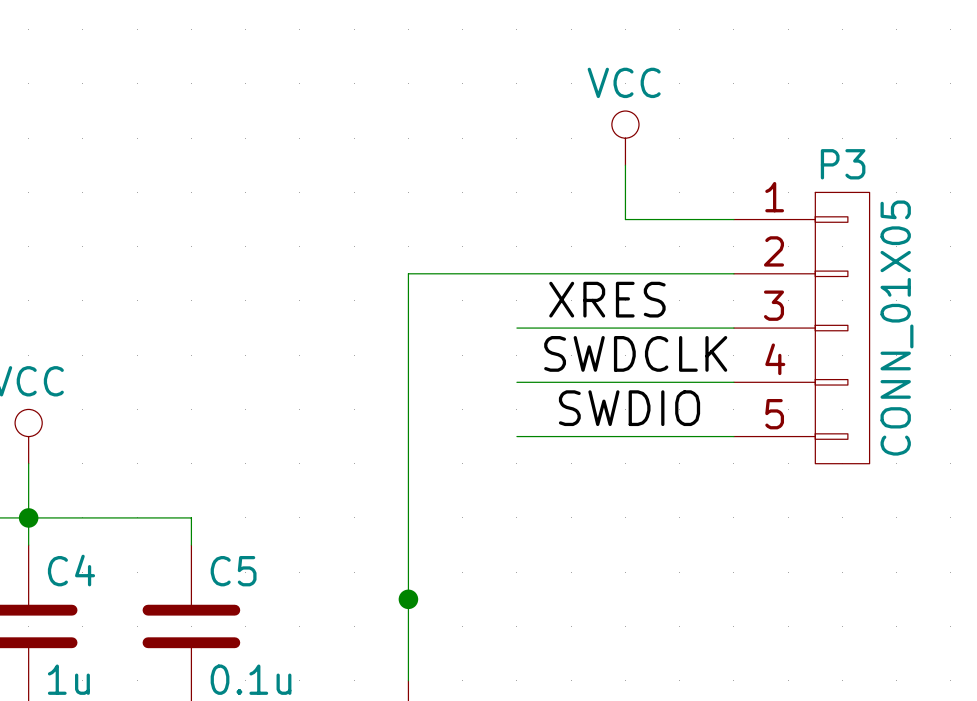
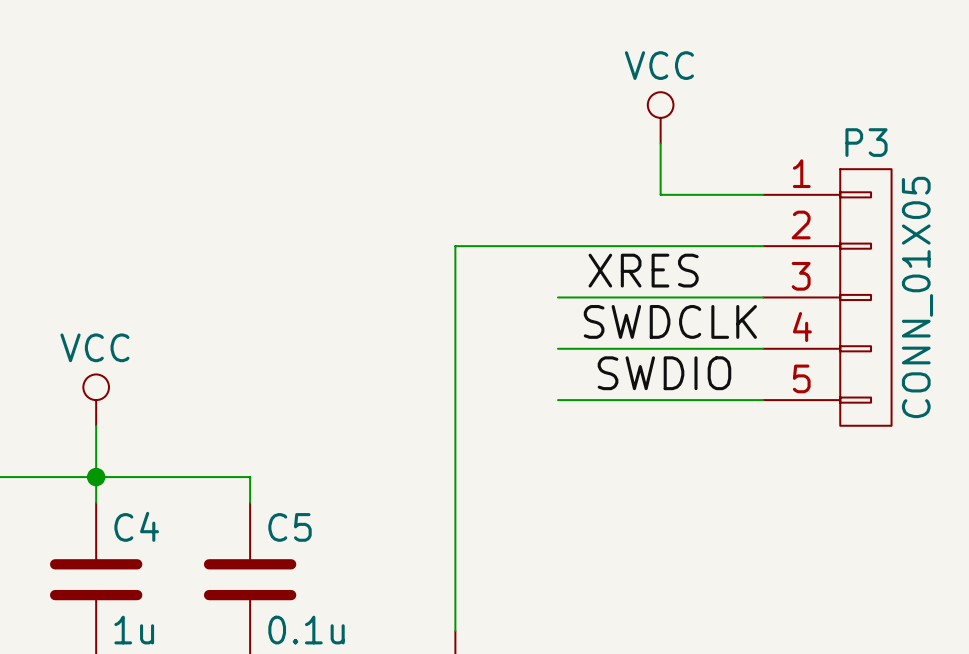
junction: (408, 599) -> none

